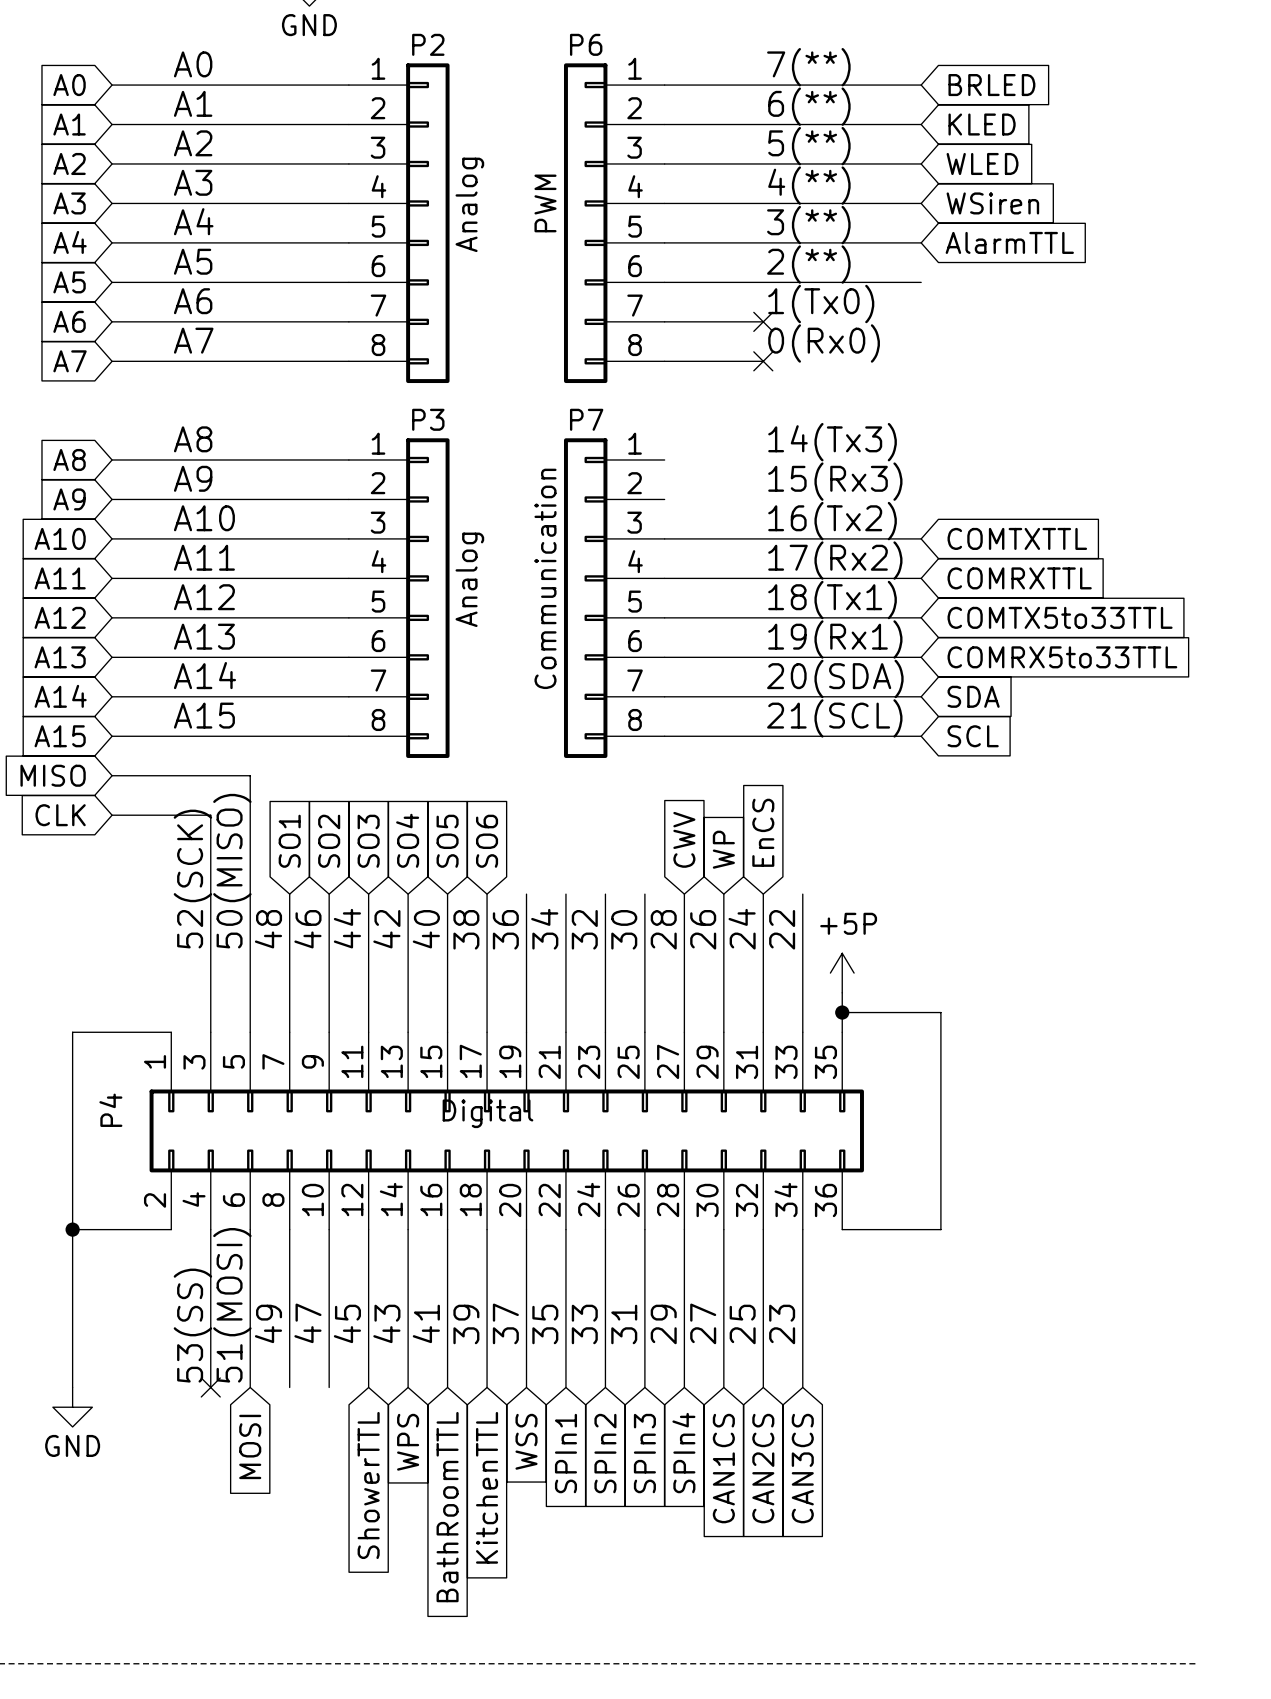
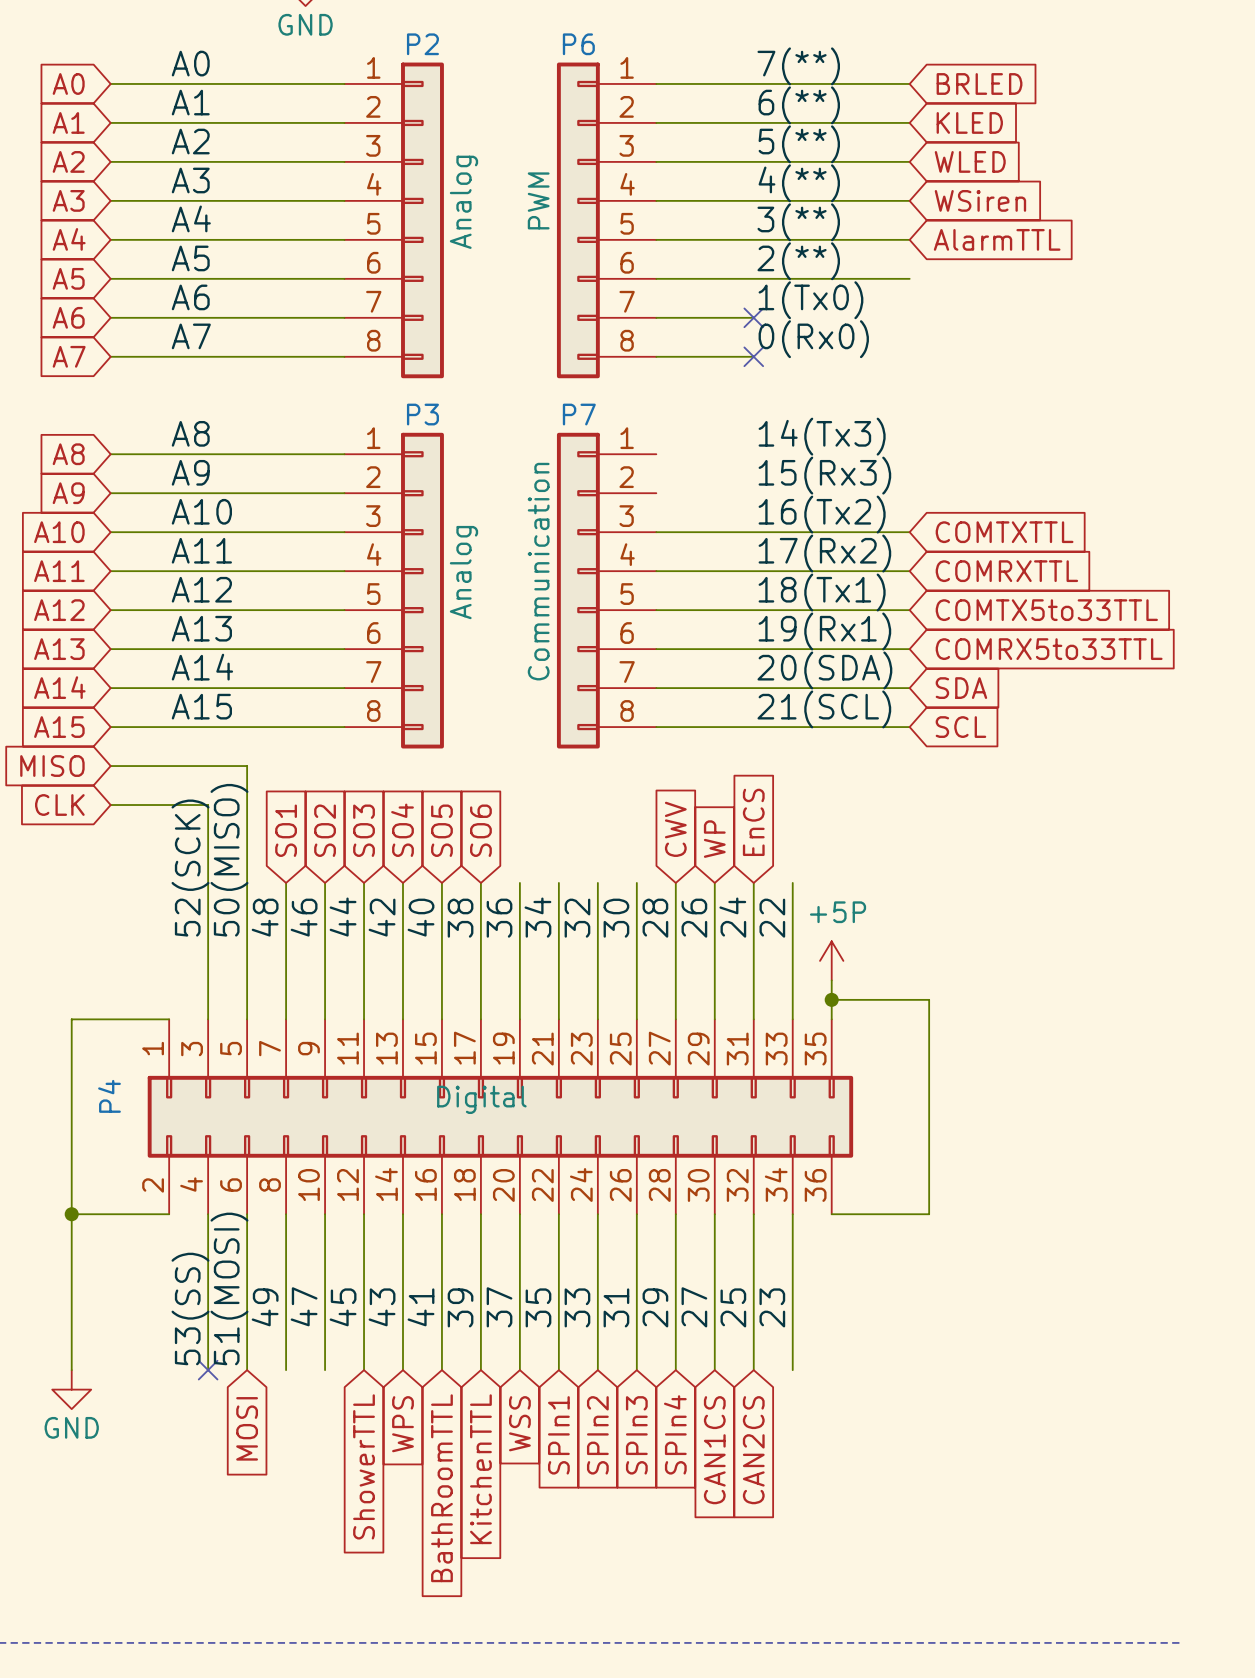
global label: CAN3CS (802, 1468) -> none

